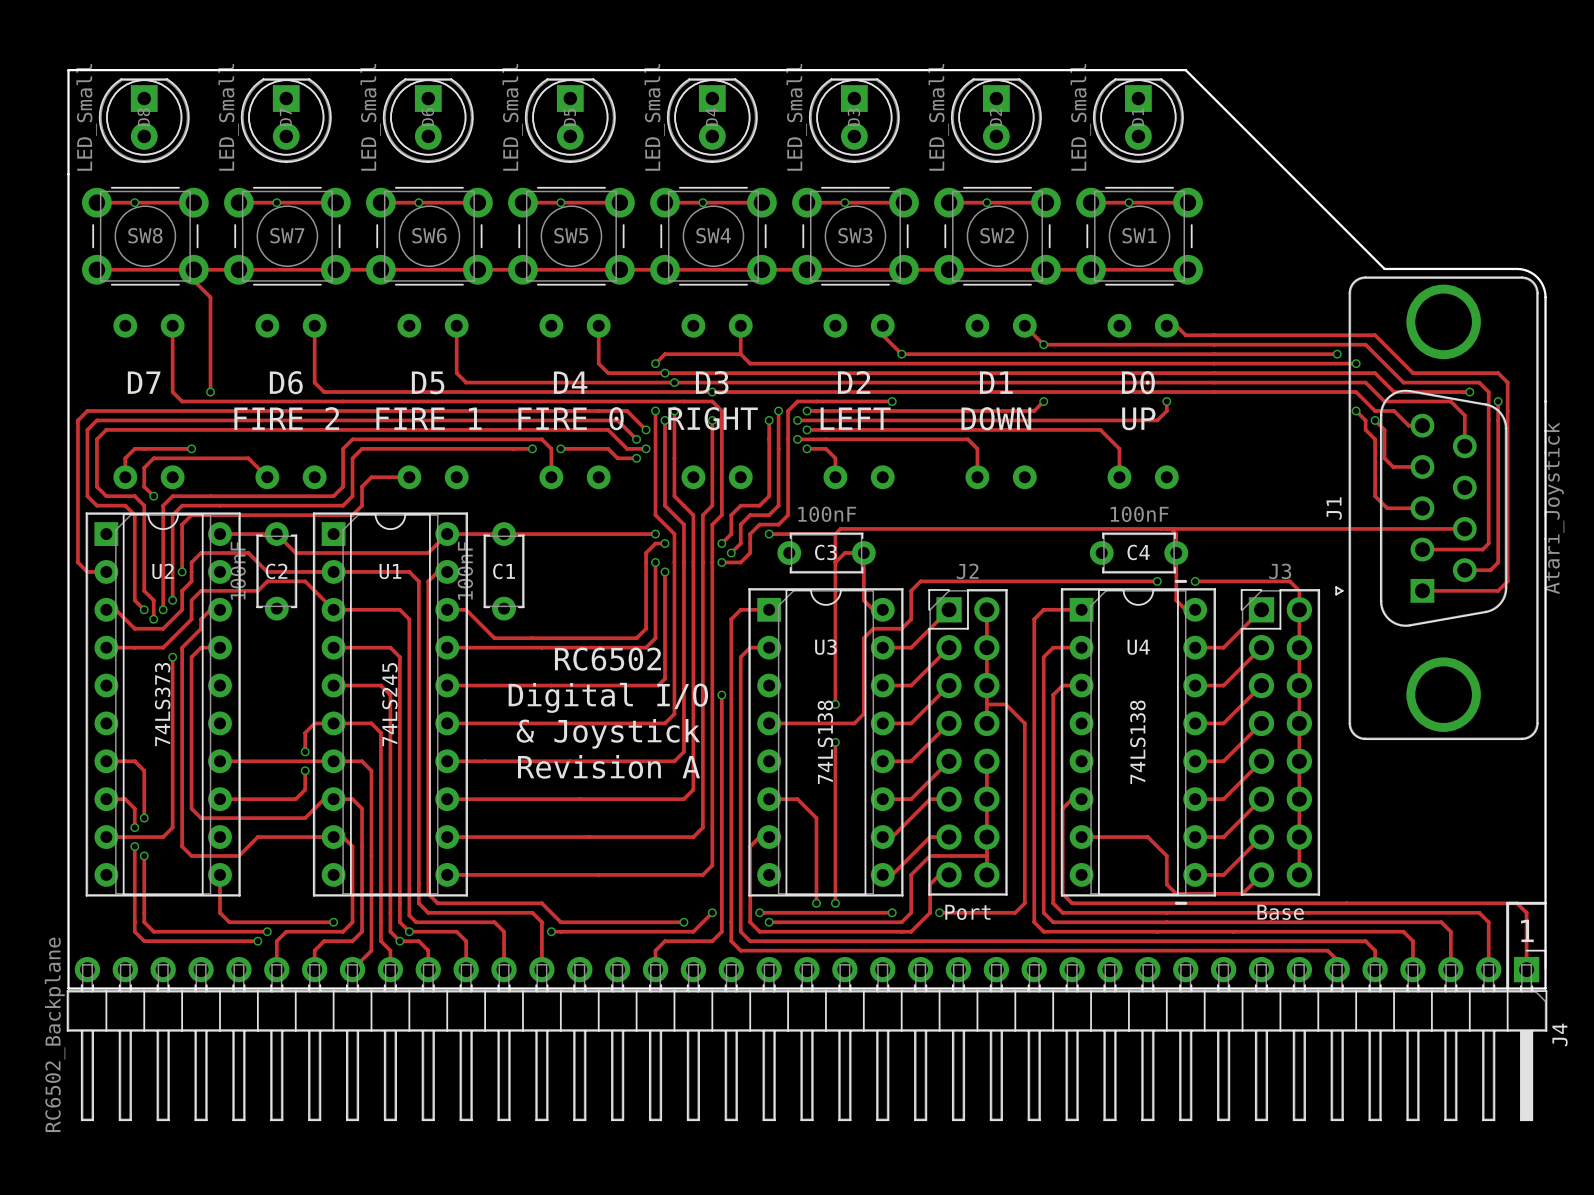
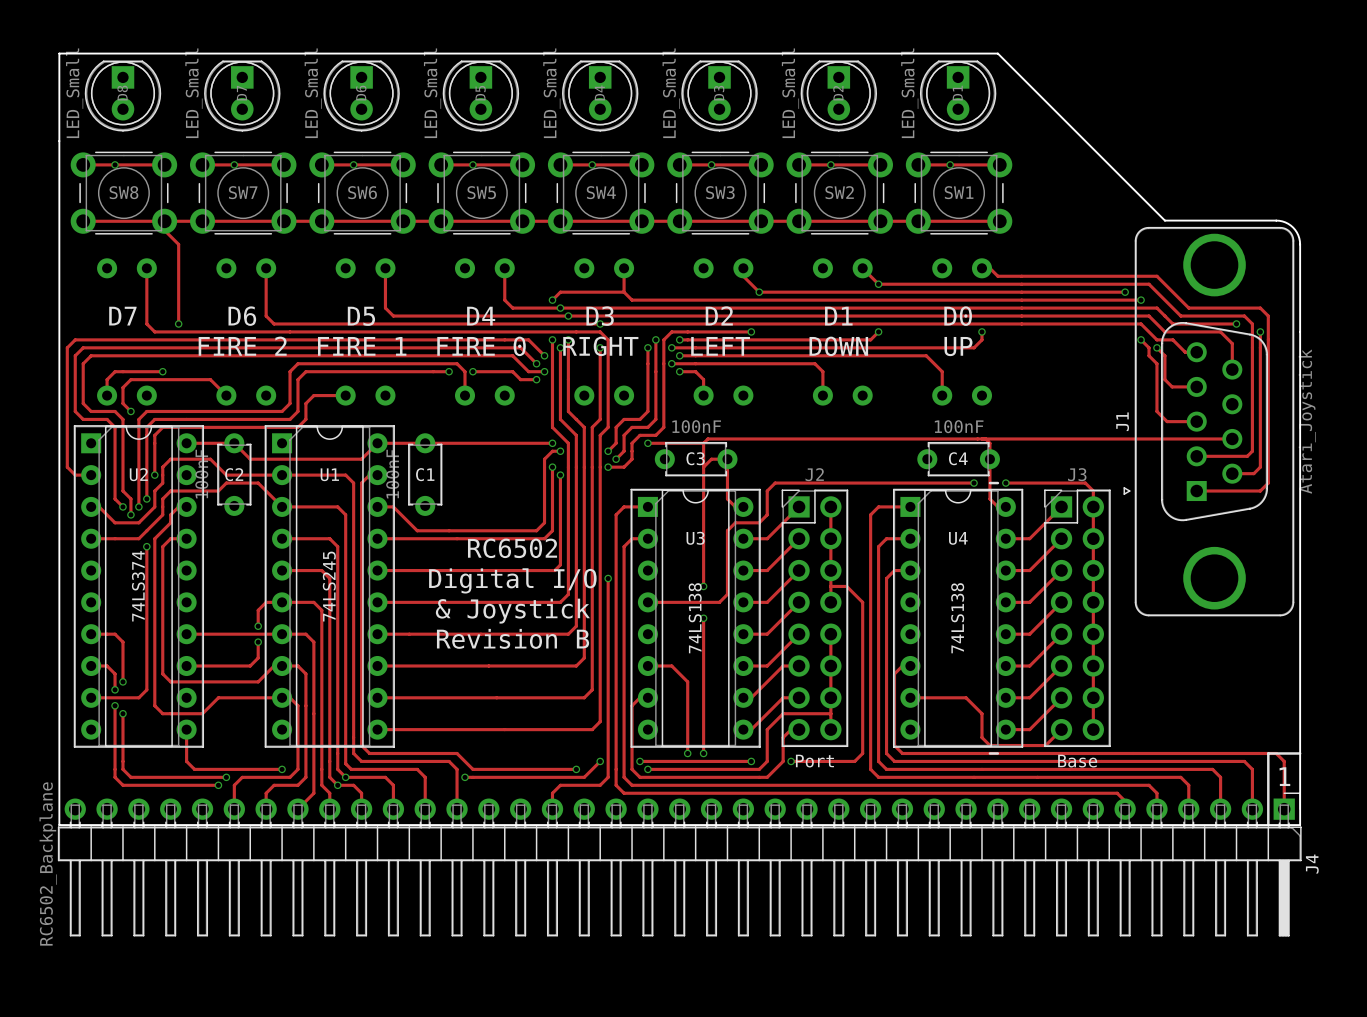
U2 value: 74LS373 (162, 704) -> 74LS374 (138, 586)
text: Revision A (608, 766) -> Revision B (513, 638)

